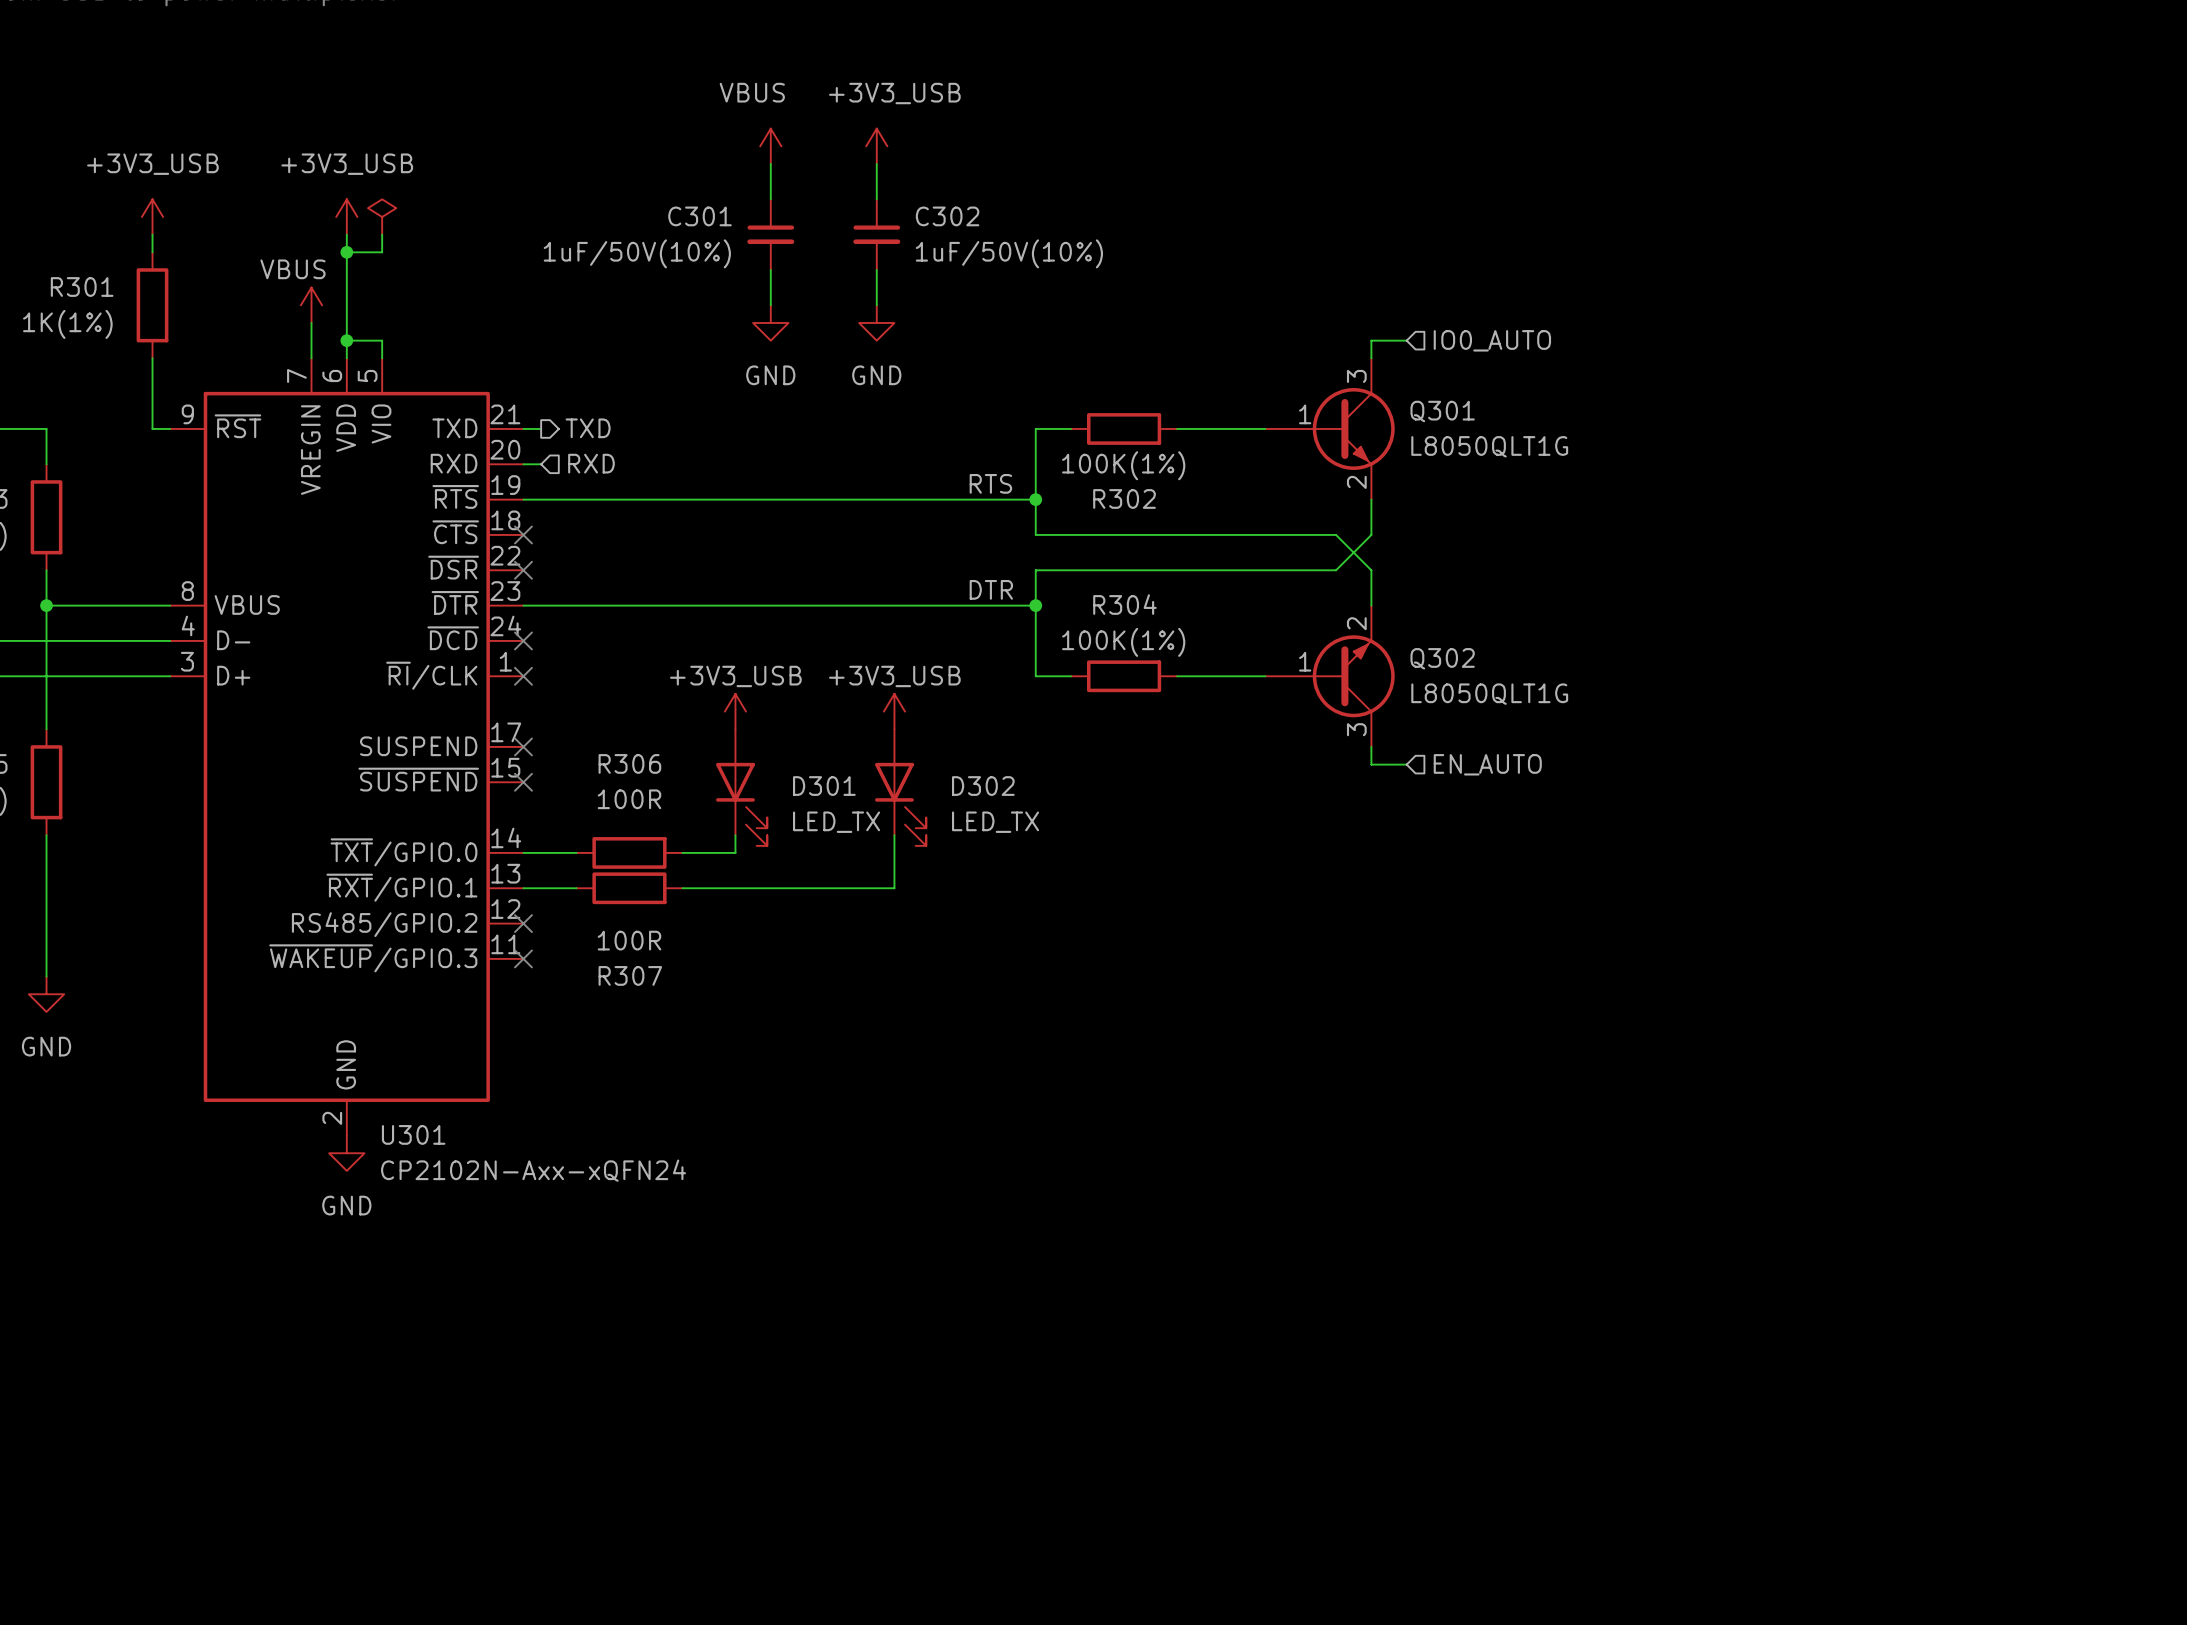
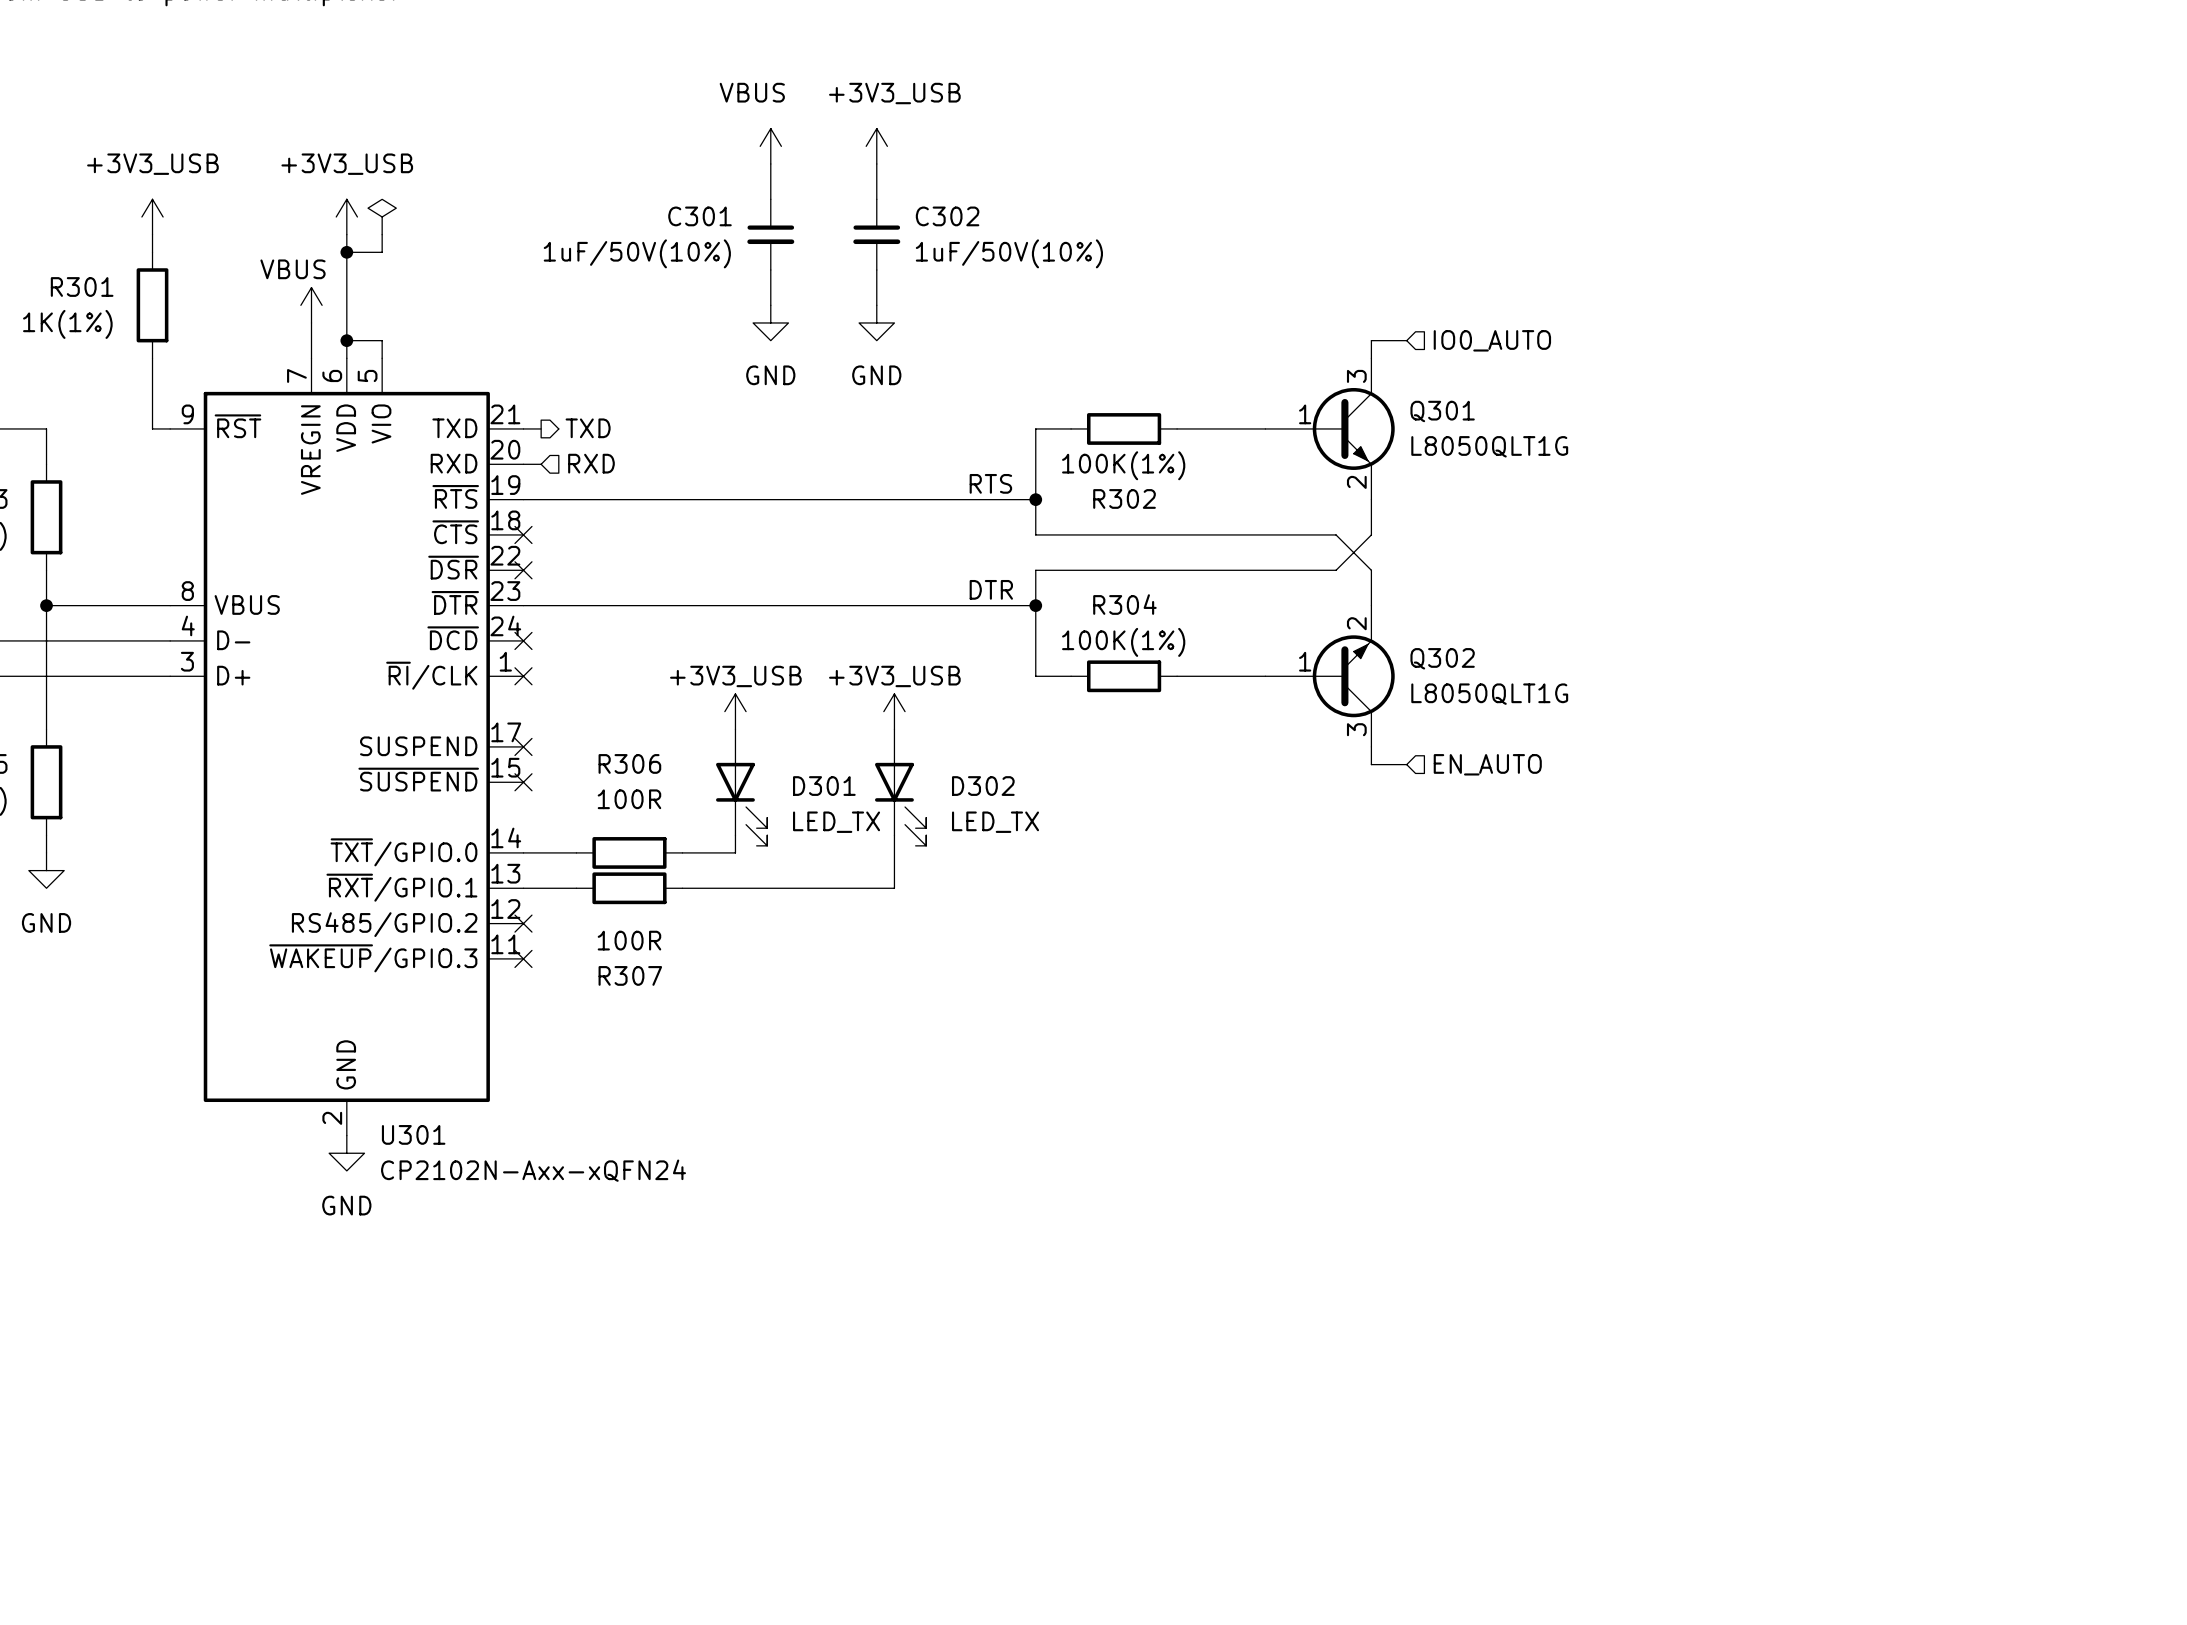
wire: (46, 852) (46, 976) -> none
power symbol position: GND (46, 994) -> GND (46, 870)

